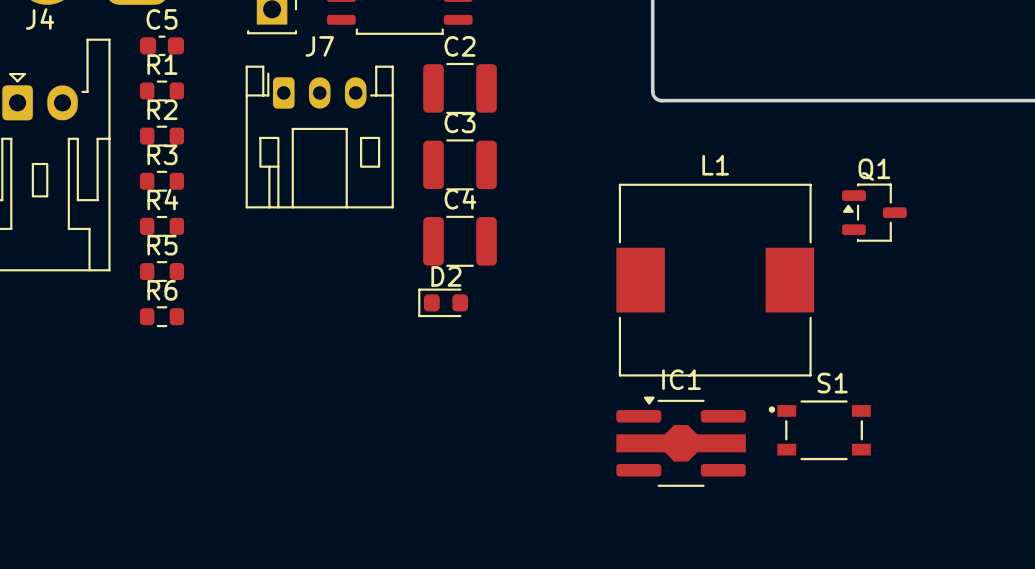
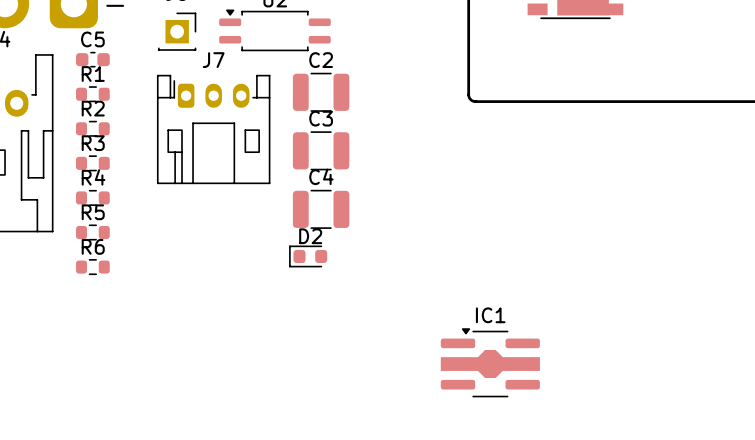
Q1: (874, 212) -> none
L1: (715, 280) -> none
S1: (819, 430) -> none

